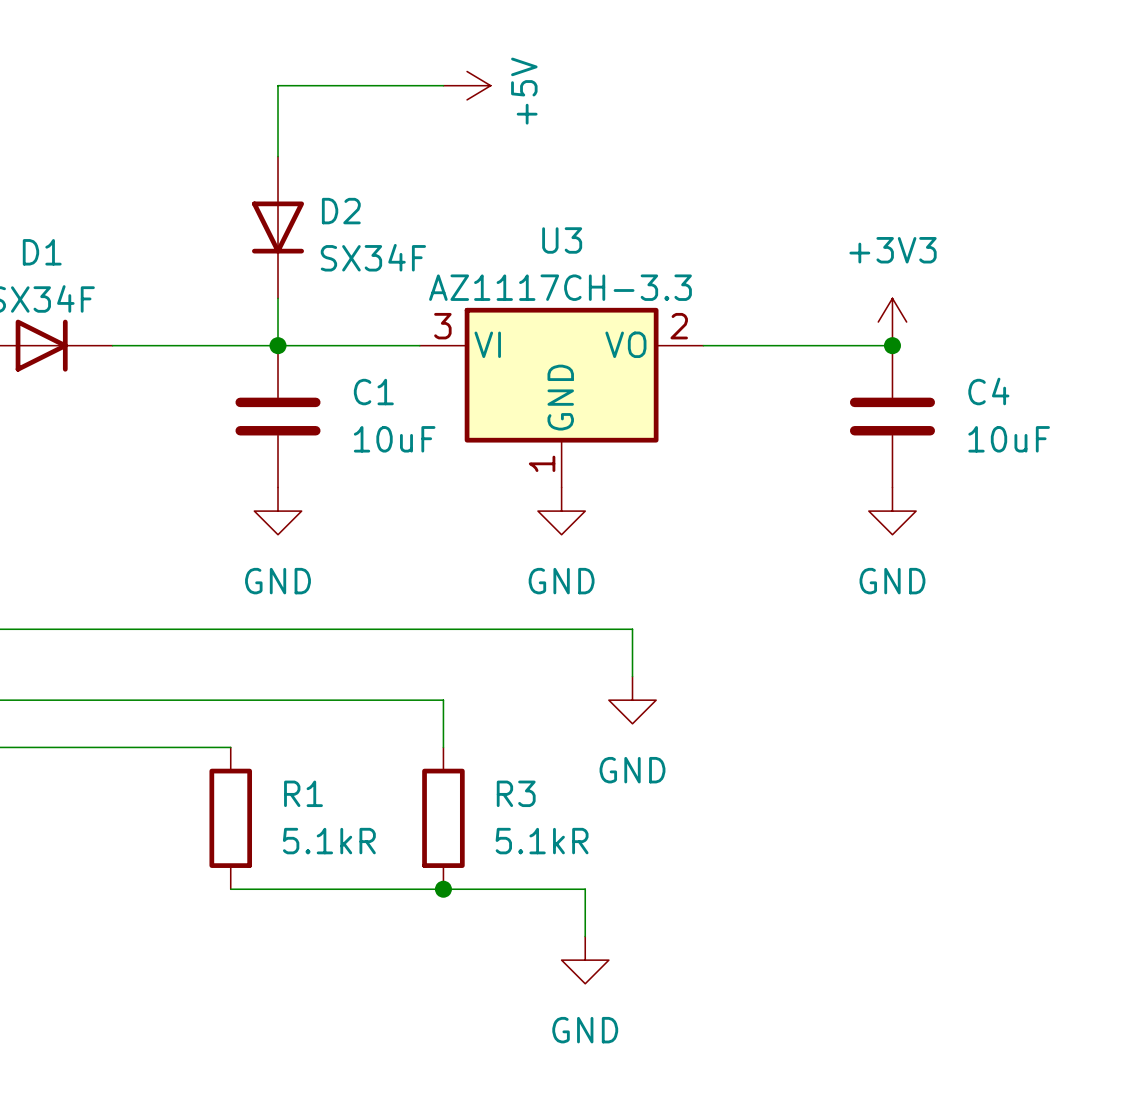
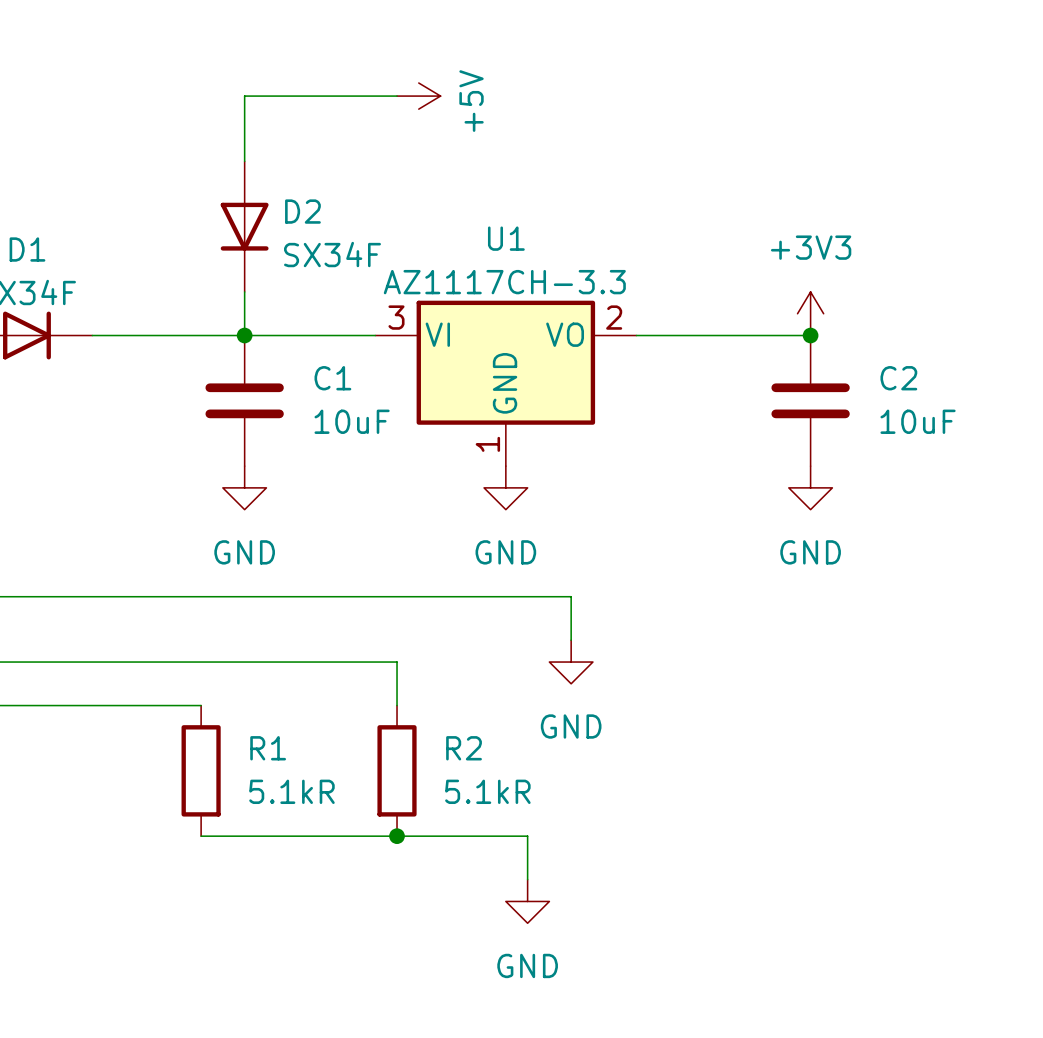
U3 name: U3 (562, 240) -> U1 (506, 238)
C4 name: C4 (988, 391) -> C2 (898, 378)
R3 name: R3 (516, 793) -> R2 (464, 748)

